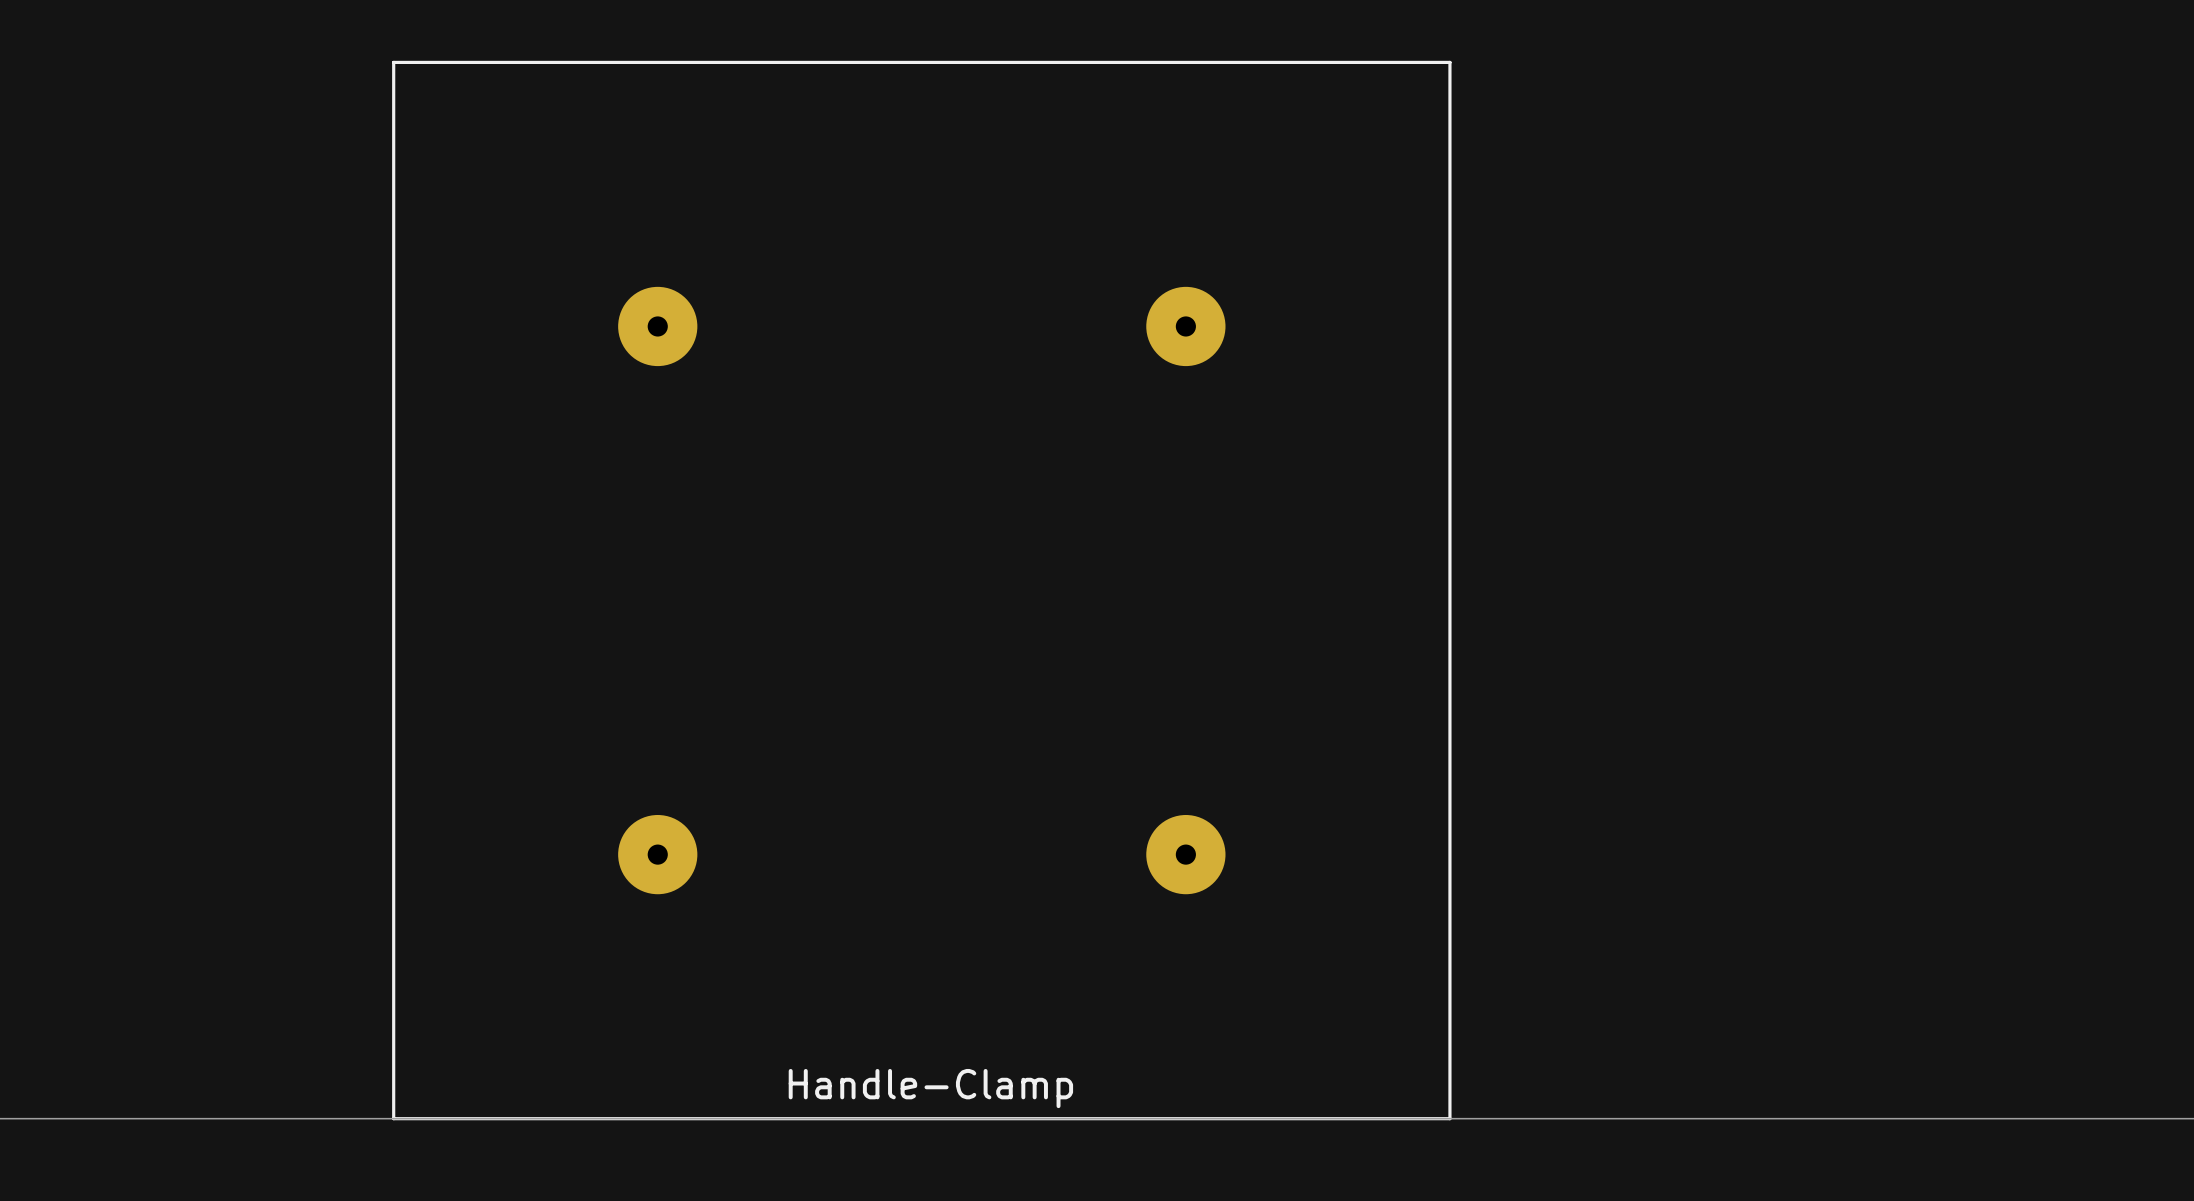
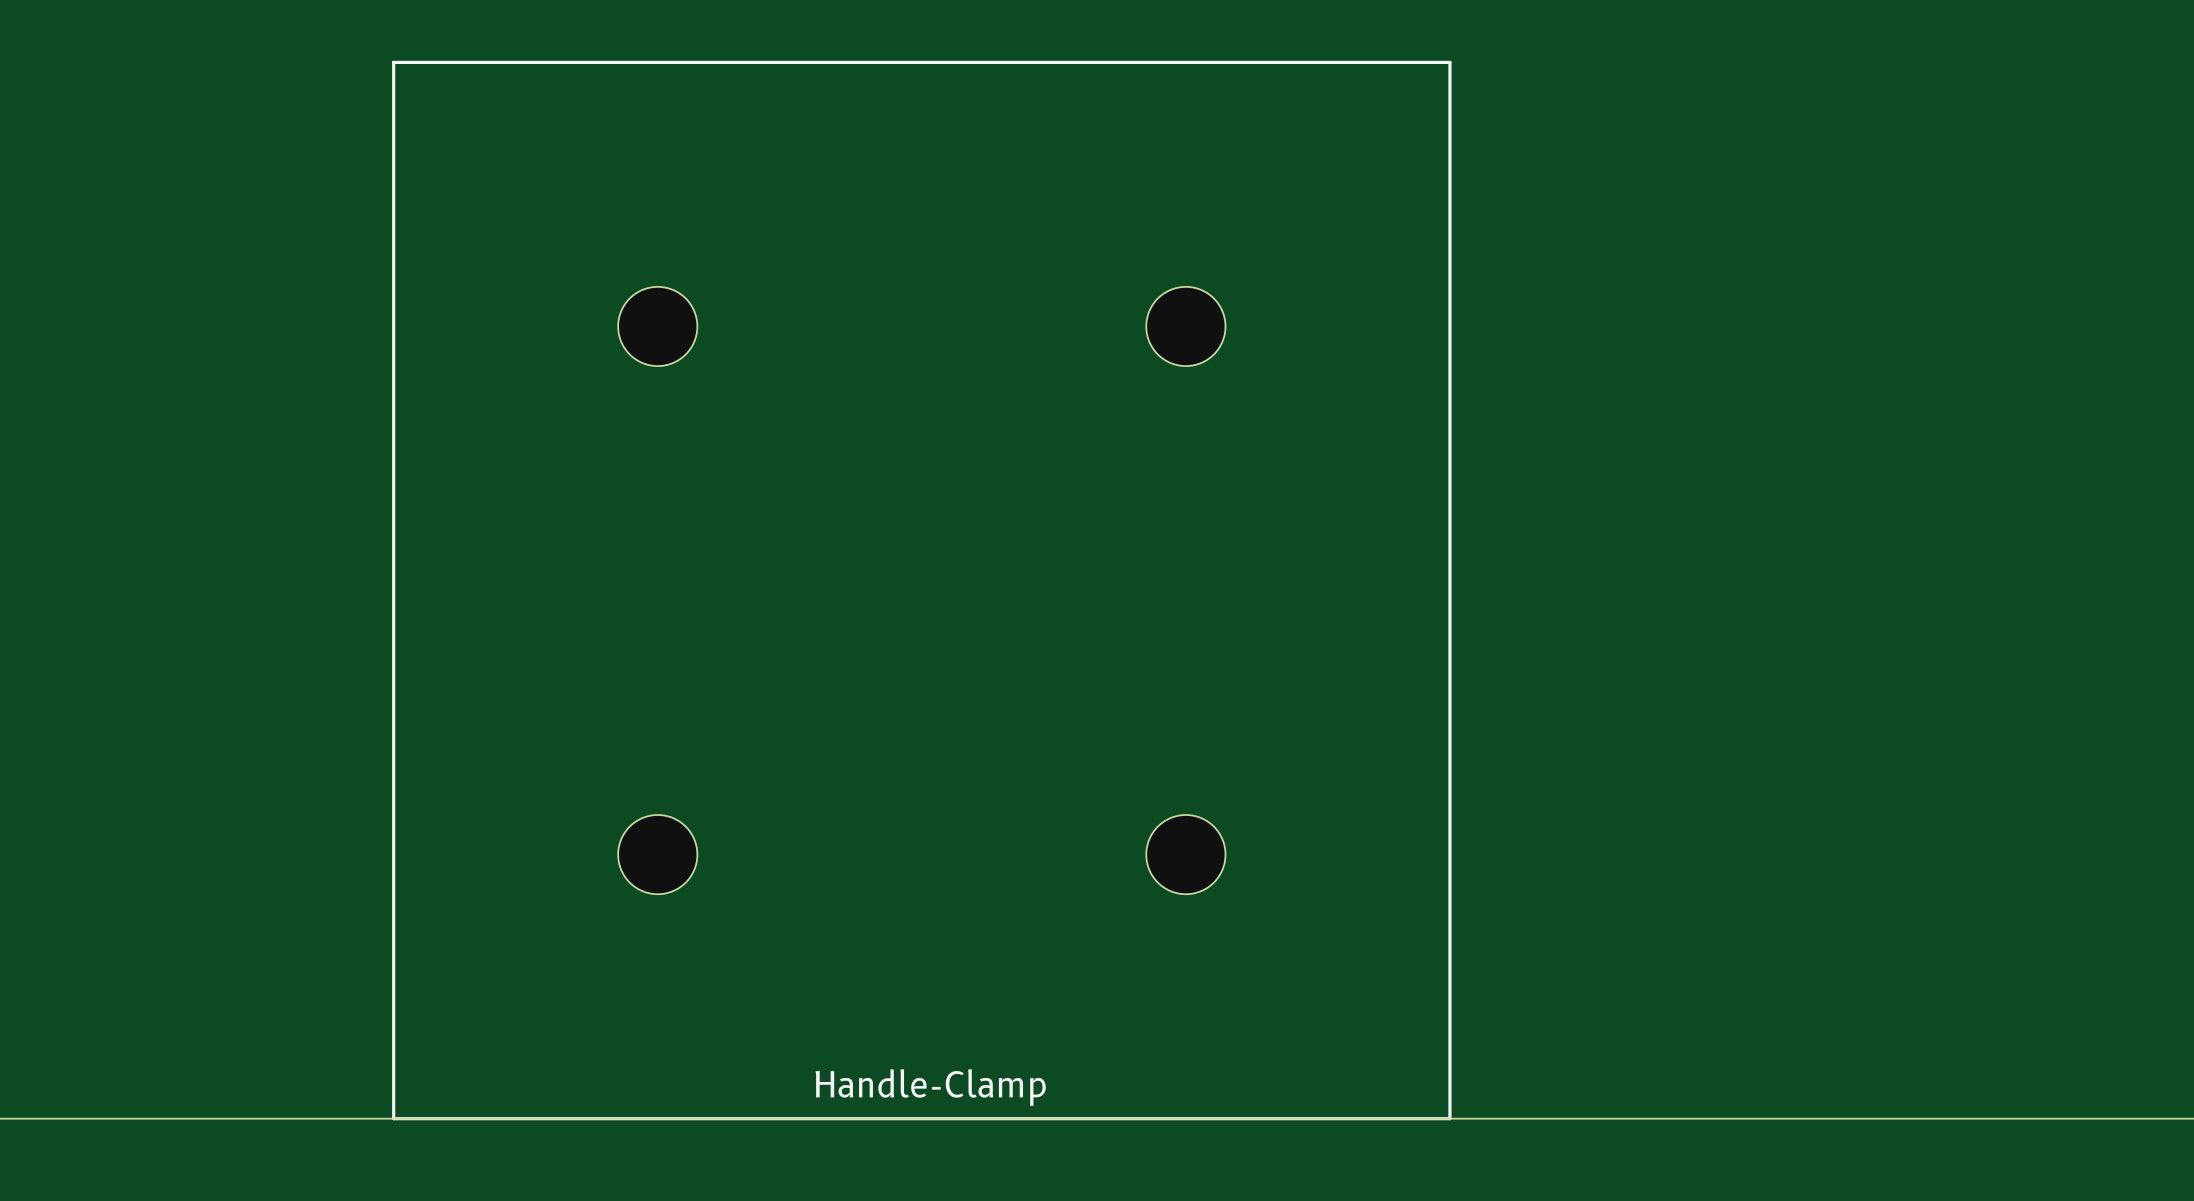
part footprint: [392, 60, 1452, 1121] -> [392, 60, 1452, 1121]

